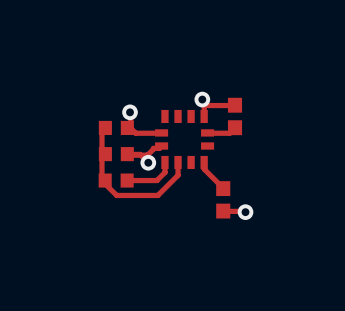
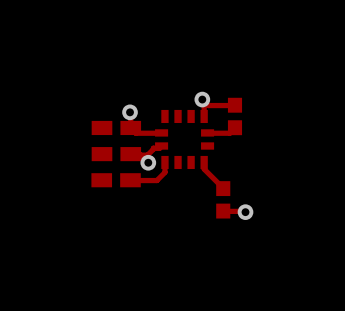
part footprint: [98, 120, 134, 136] -> [91, 120, 142, 136]
top track: (102, 127) (102, 180) -> none
part footprint: [98, 147, 134, 162] -> [91, 147, 142, 162]
top track: (178, 162) (178, 175) (157, 195) (116, 195) (101, 180) -> none
part footprint: [98, 173, 134, 188] -> [91, 173, 141, 188]

